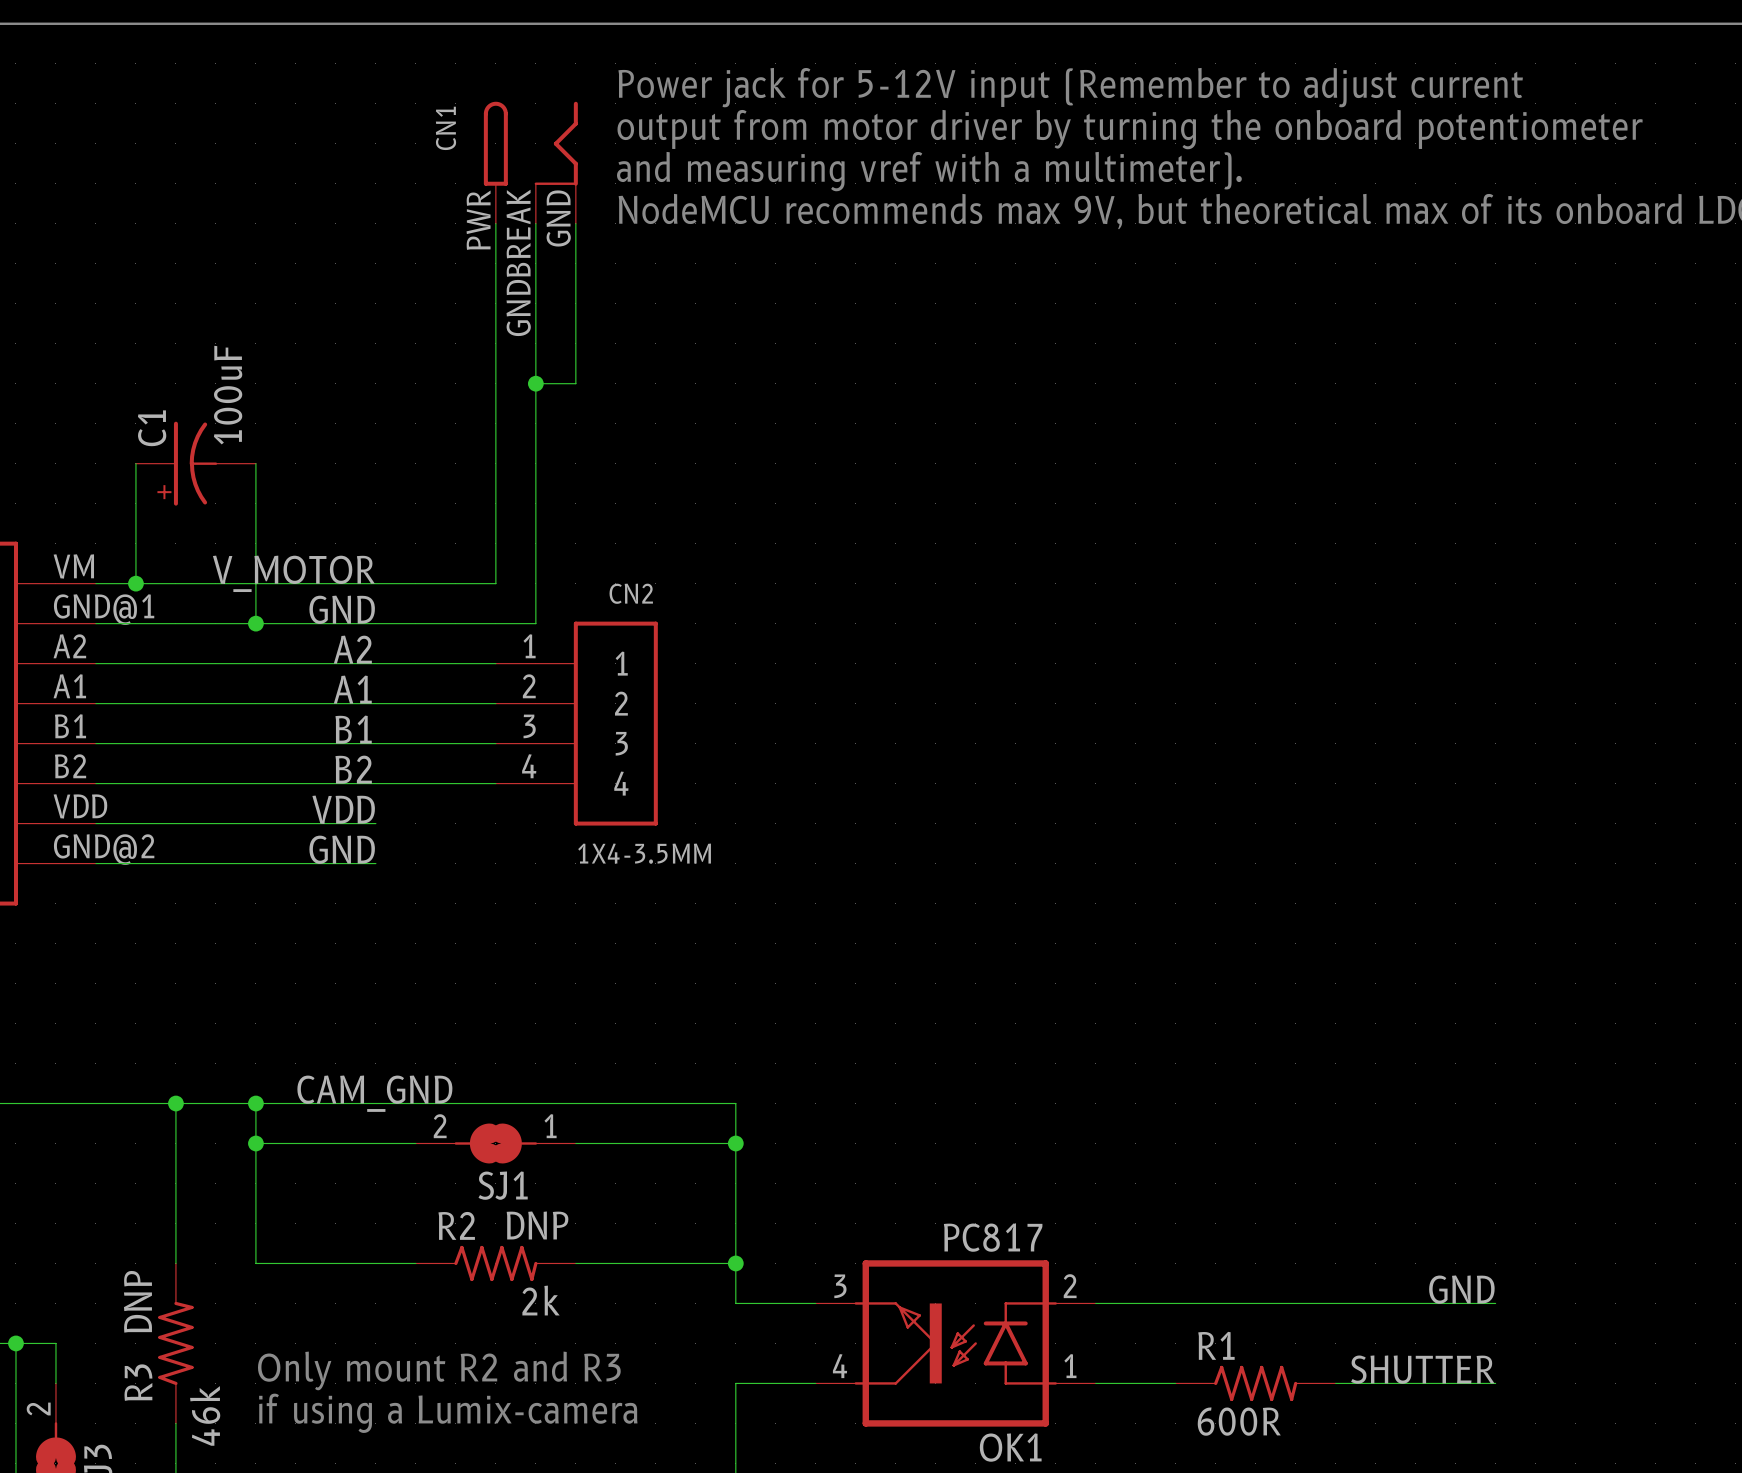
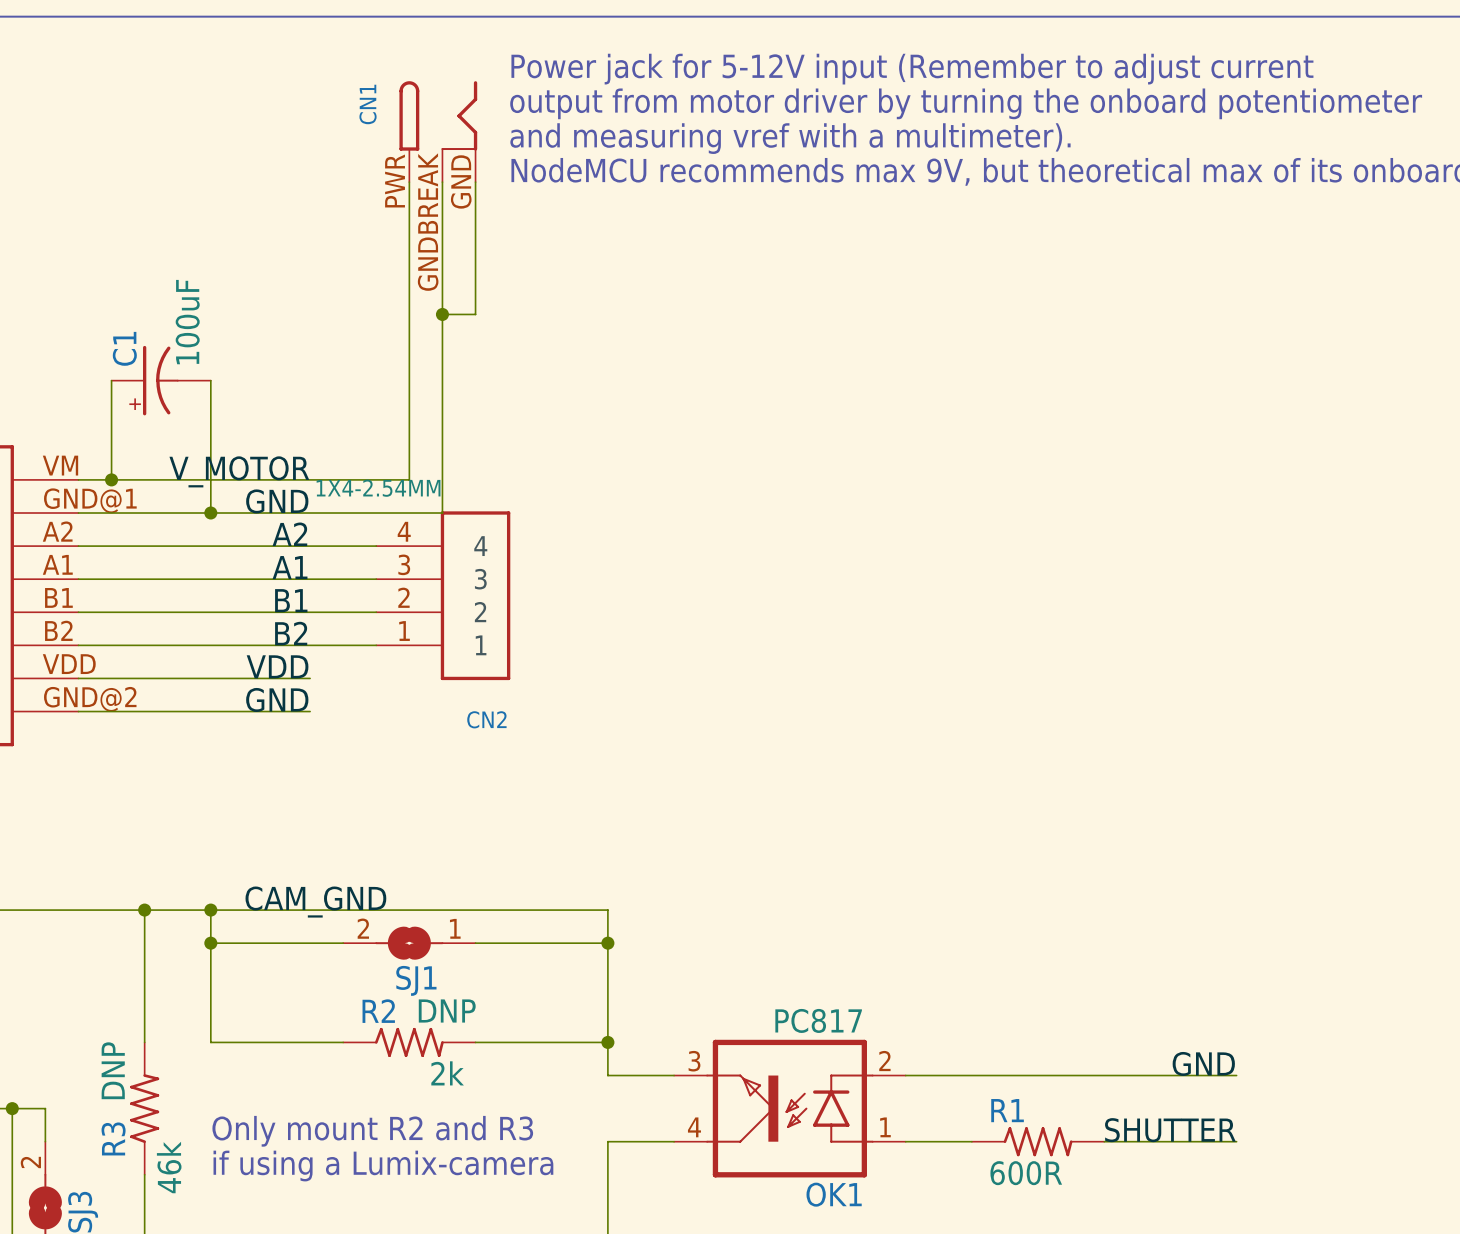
CN2 flip: as is (615, 723) -> up-down (475, 595)
CN2 value: 1X4-3.5MM (644, 853) -> 1X4-2.54MM (378, 488)

